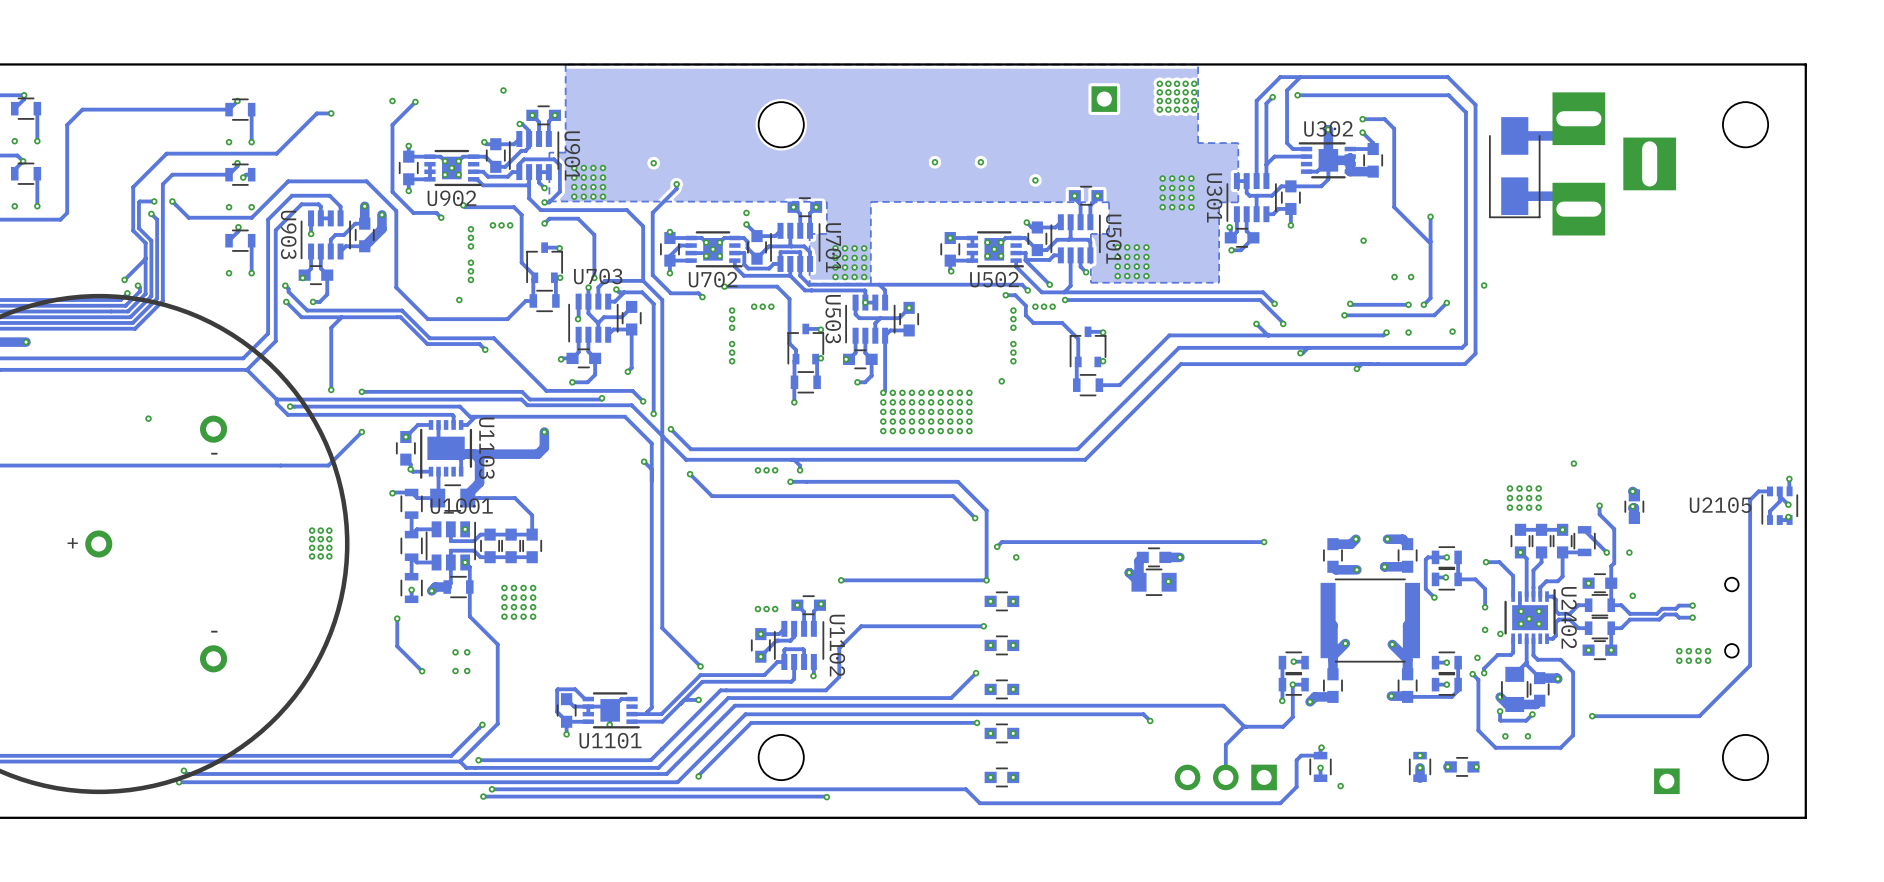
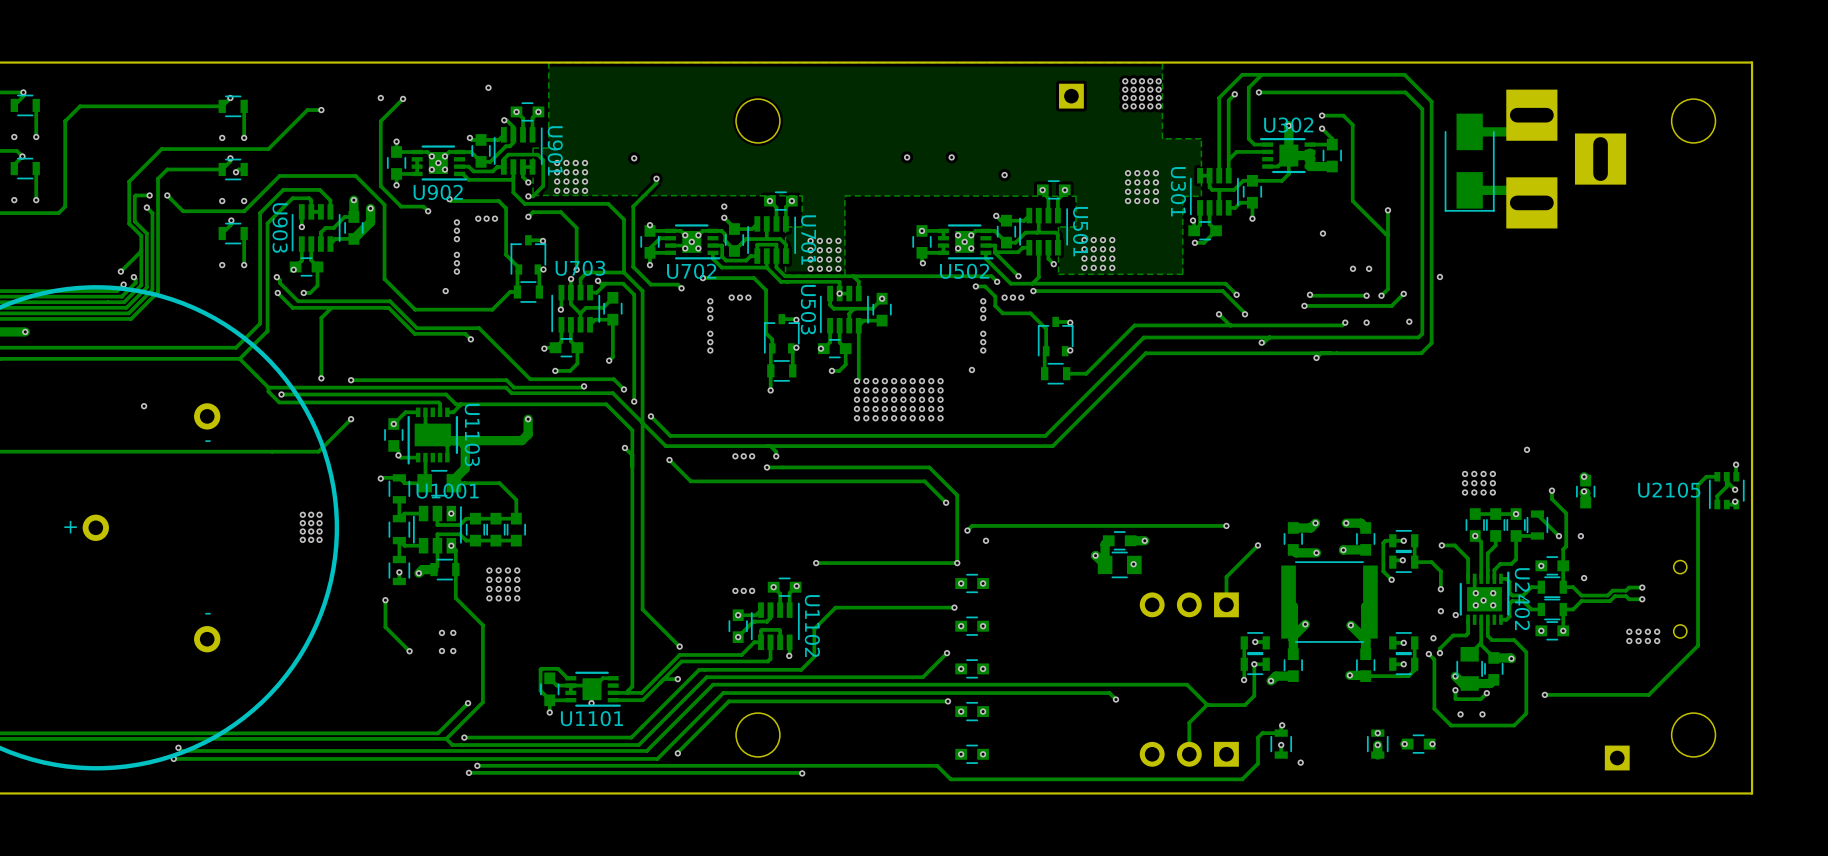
track: none -> (1258, 545) (1226, 576) (1226, 604)
via: none -> (1258, 545)
part: none -> (1189, 604)

